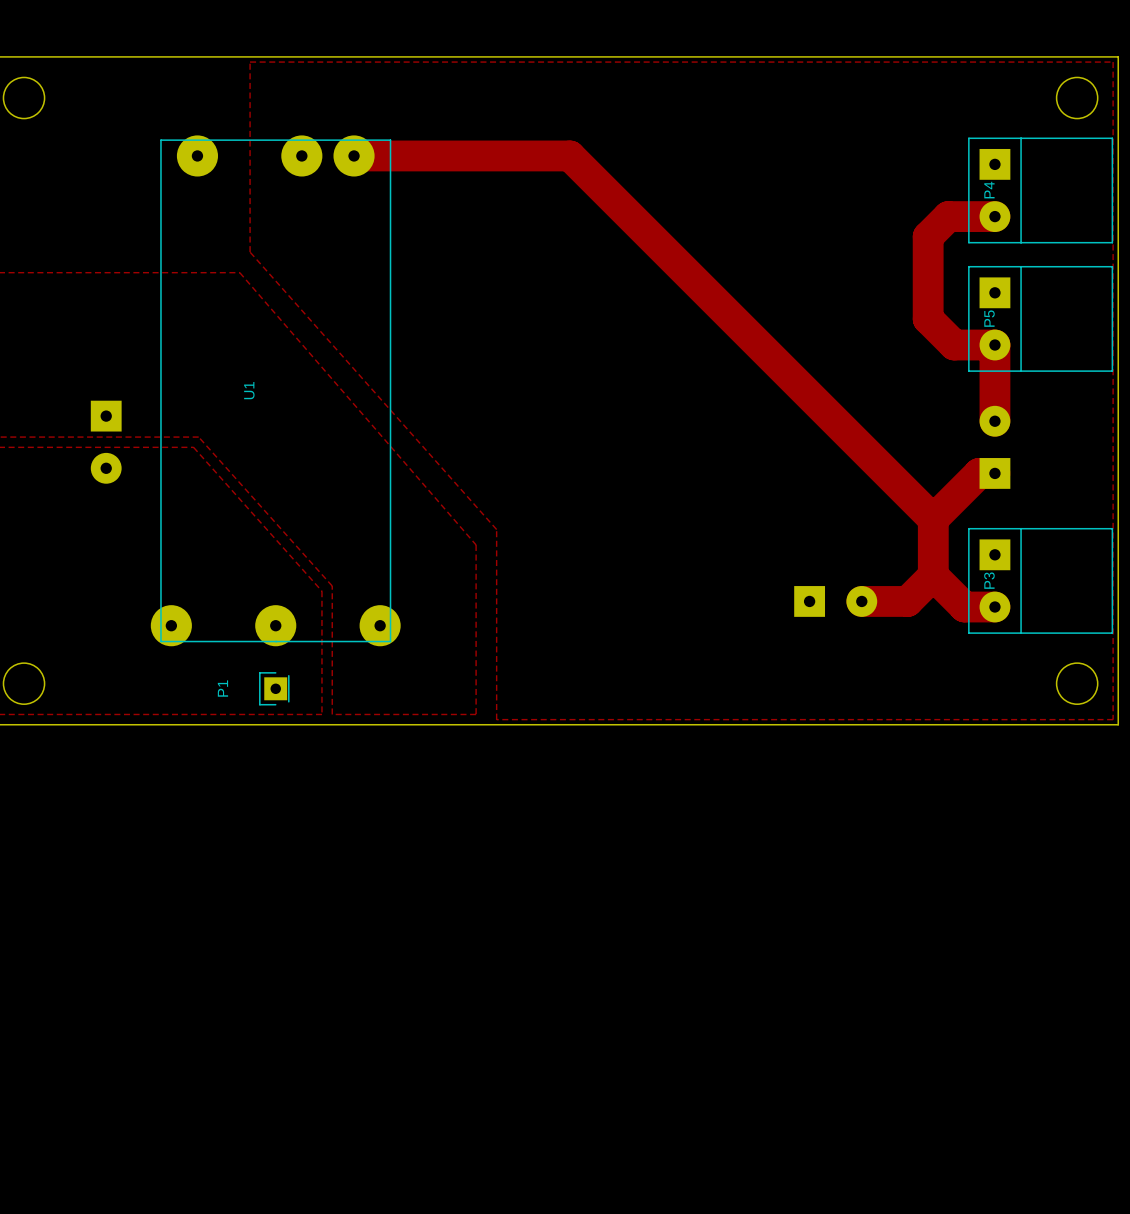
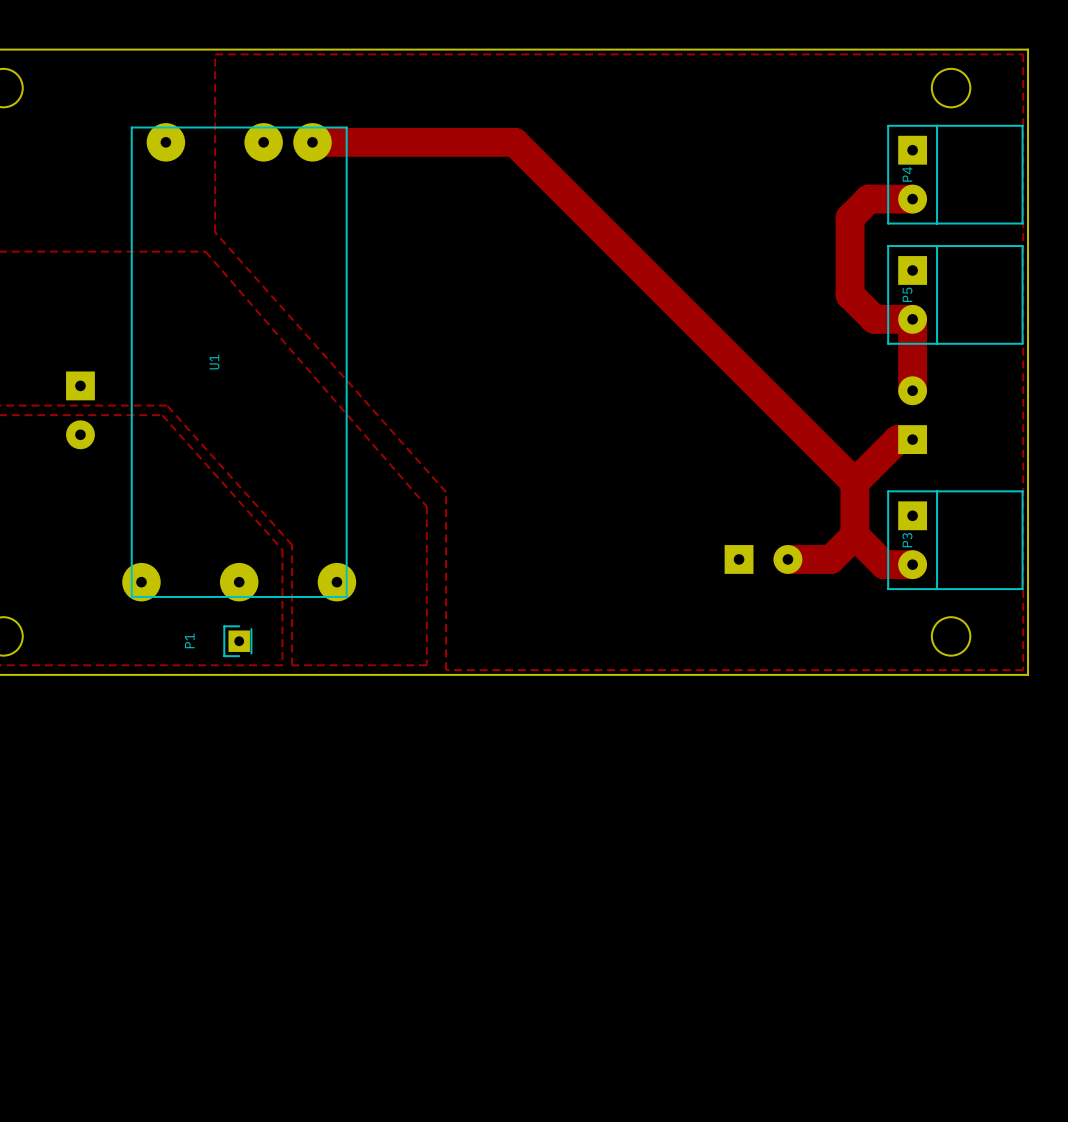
round board edge position: (1077, 98) -> (951, 88)
round board edge position: (1077, 683) -> (951, 636)

